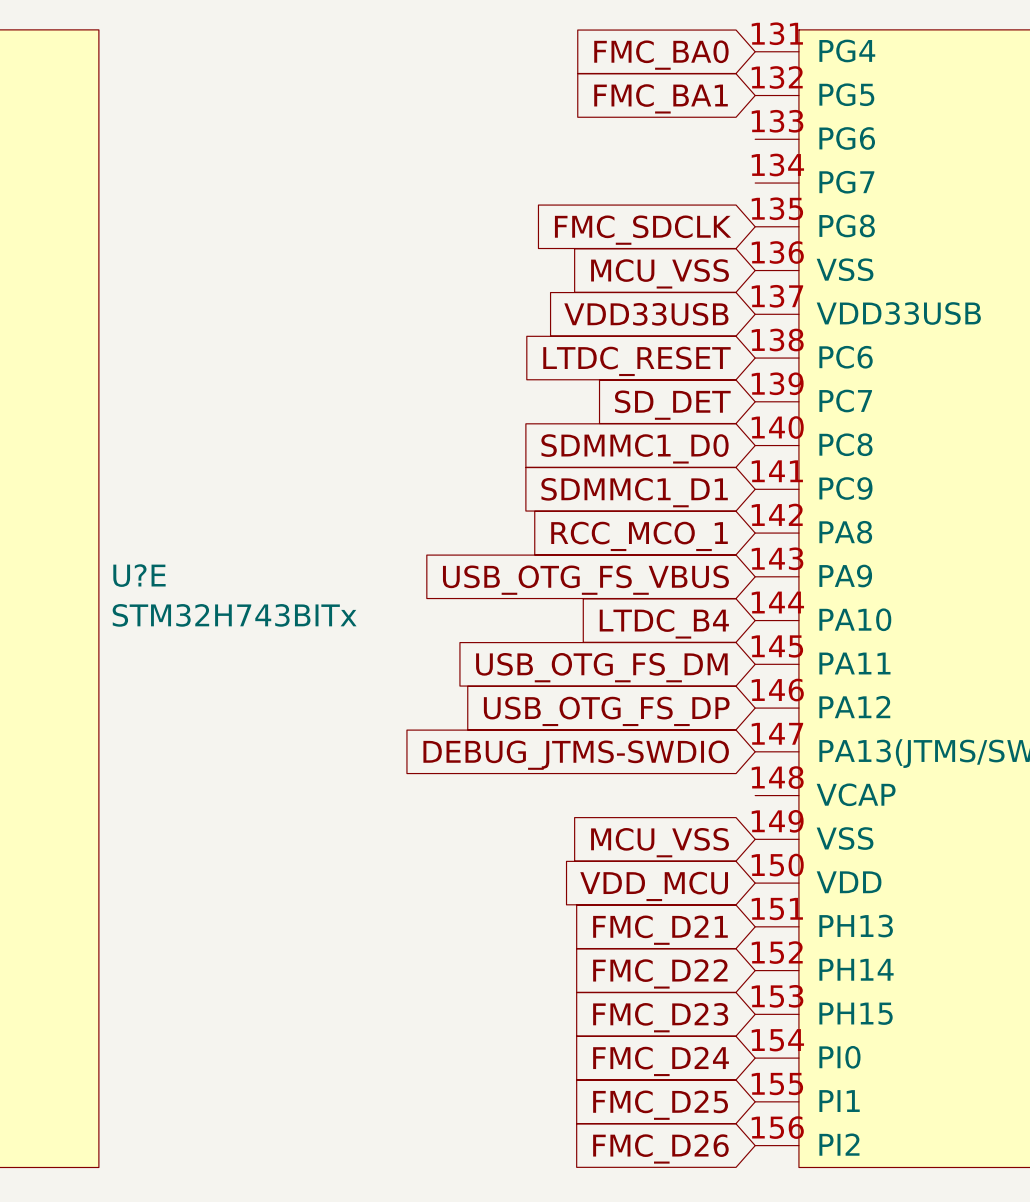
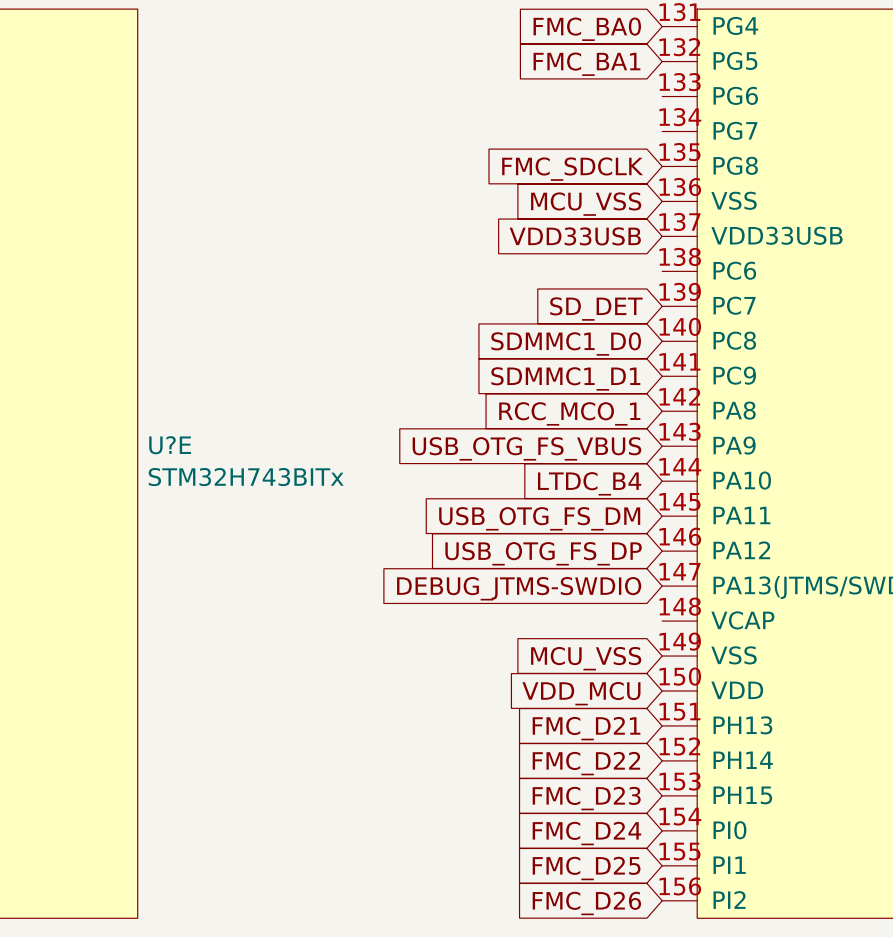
global label: LTDC_RESET (636, 361) -> none

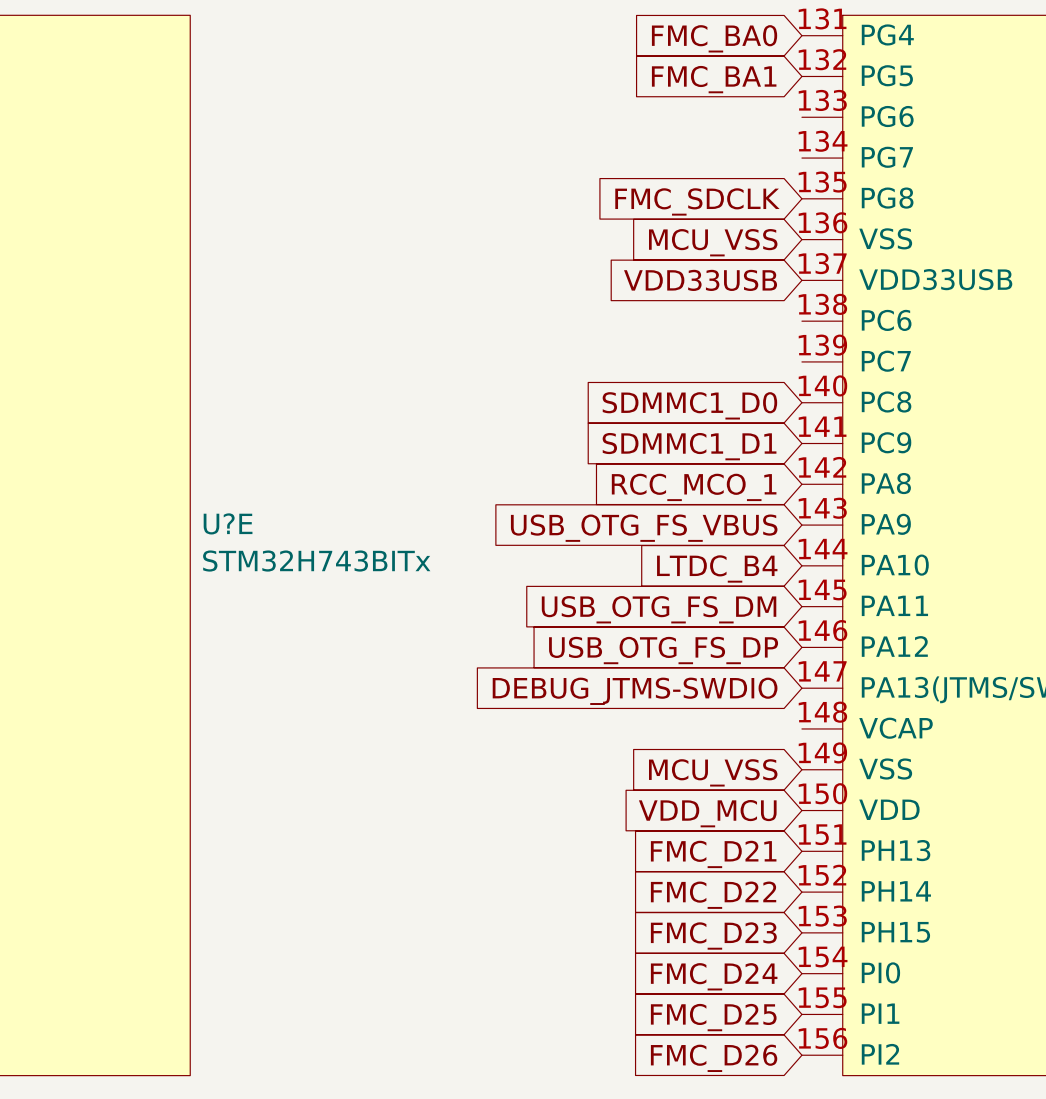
global label: SD_DET (596, 309) -> none

